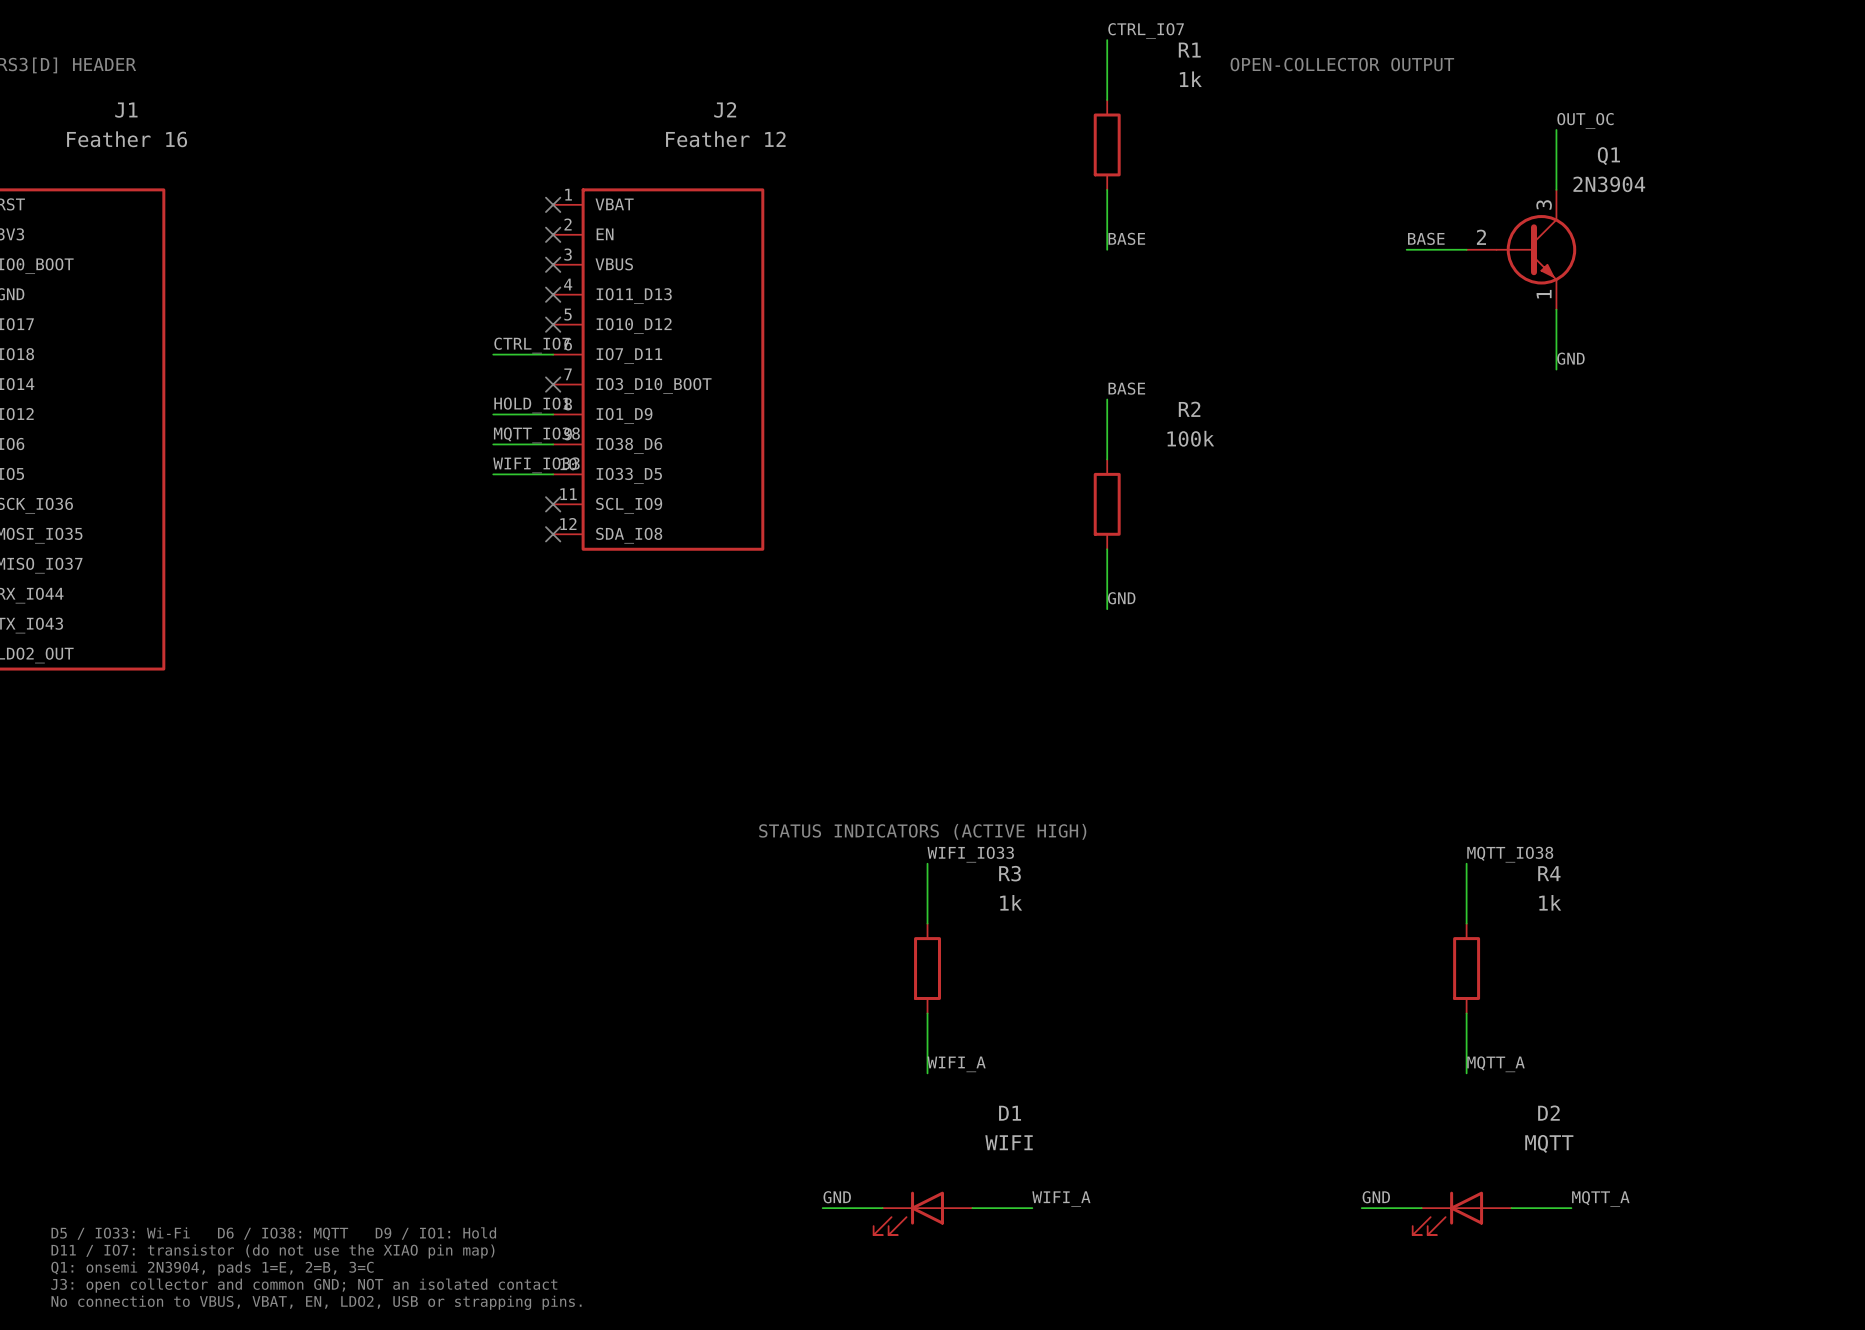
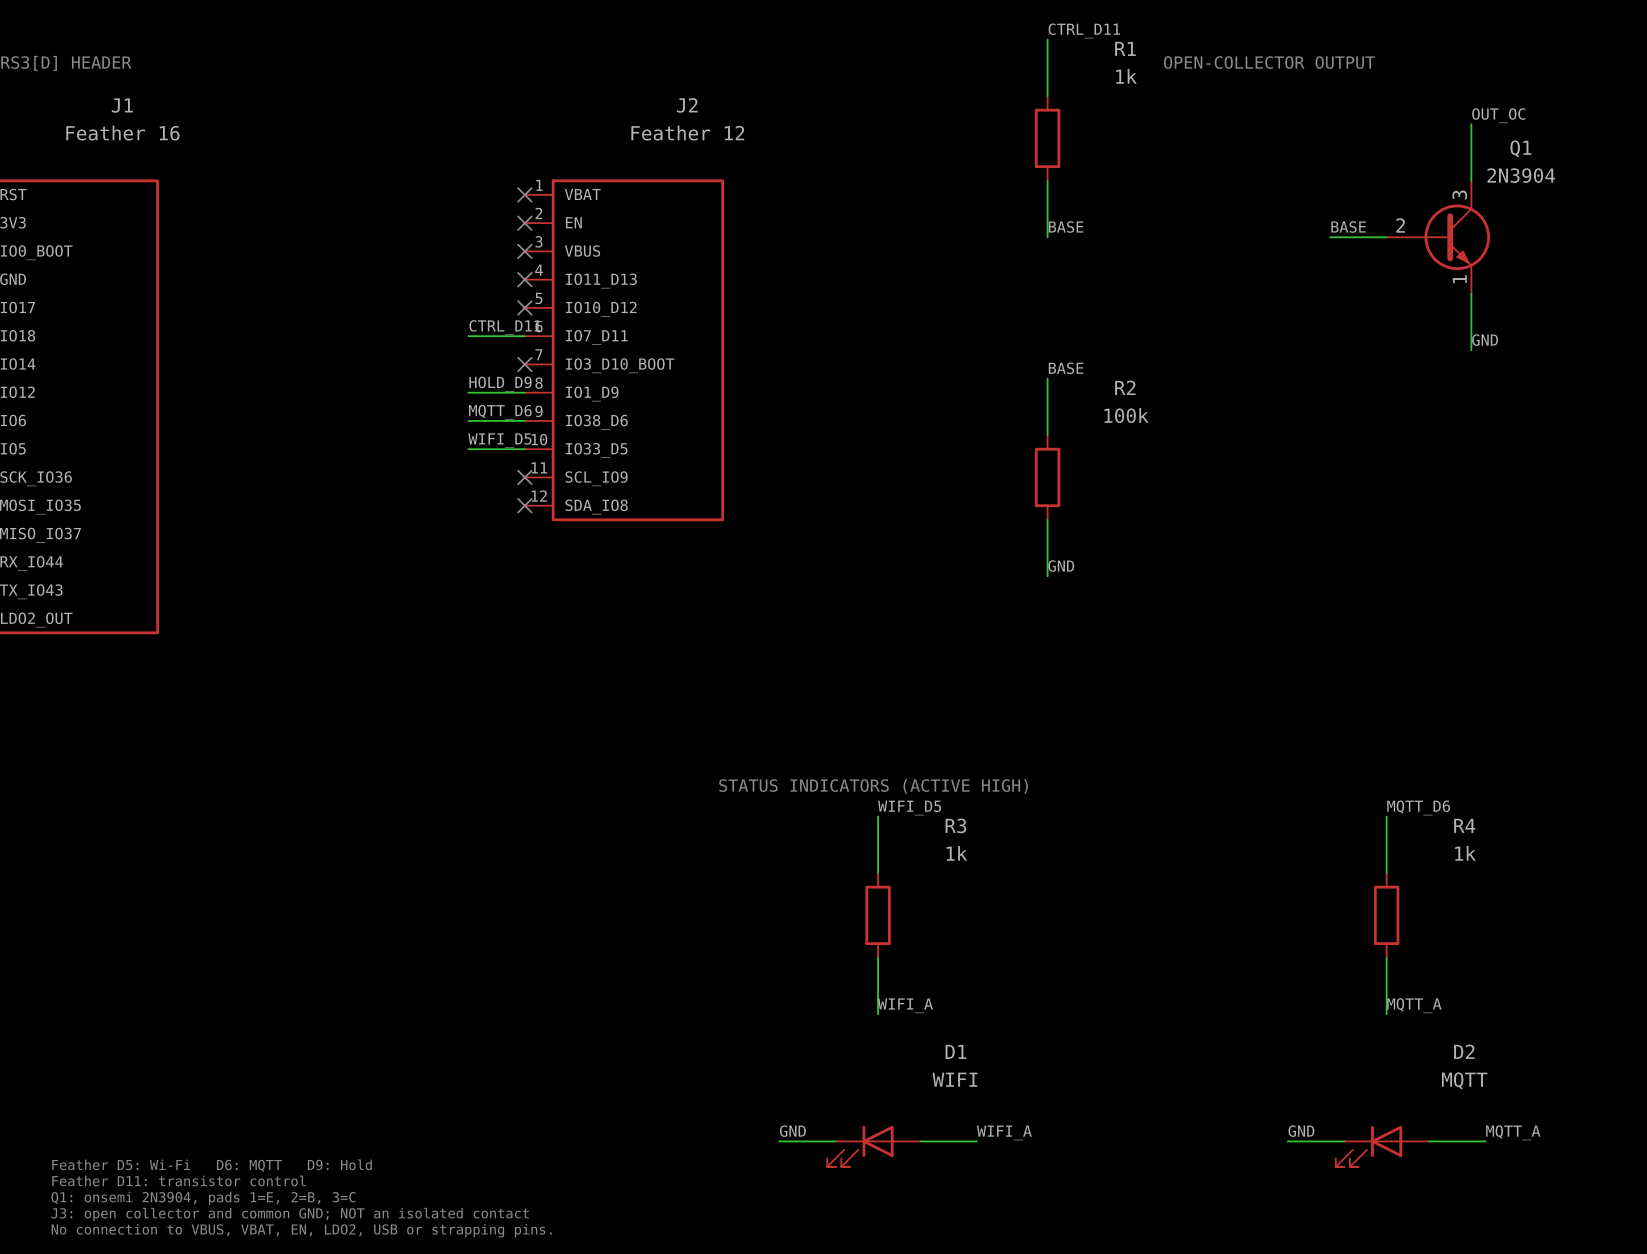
label: CTRL_IO7 (1146, 31) -> CTRL_D11 (1084, 30)
label: CTRL_IO7 (532, 345) -> CTRL_D11 (505, 327)
label: HOLD_IO1 (532, 405) -> HOLD_D9 (500, 384)
label: MQTT_IO38 (536, 435) -> MQTT_D6 (500, 412)
label: WIFI_IO33 (536, 465) -> WIFI_D5 (499, 440)
label: WIFI_IO33 (970, 854) -> WIFI_D5 (909, 808)
label: MQTT_IO38 (1510, 854) -> MQTT_D6 (1418, 807)
text: D5 / IO33: Wi-Fi D6 / IO38: MQTT D9 / IO1: Hold (273, 1233) -> Feather D5: Wi-Fi D6: MQTT D9: Hold (212, 1165)
text: D11 / IO7: transistor (do not use the XIAO pin map) (272, 1251) -> Feather D11: transistor control (178, 1180)

